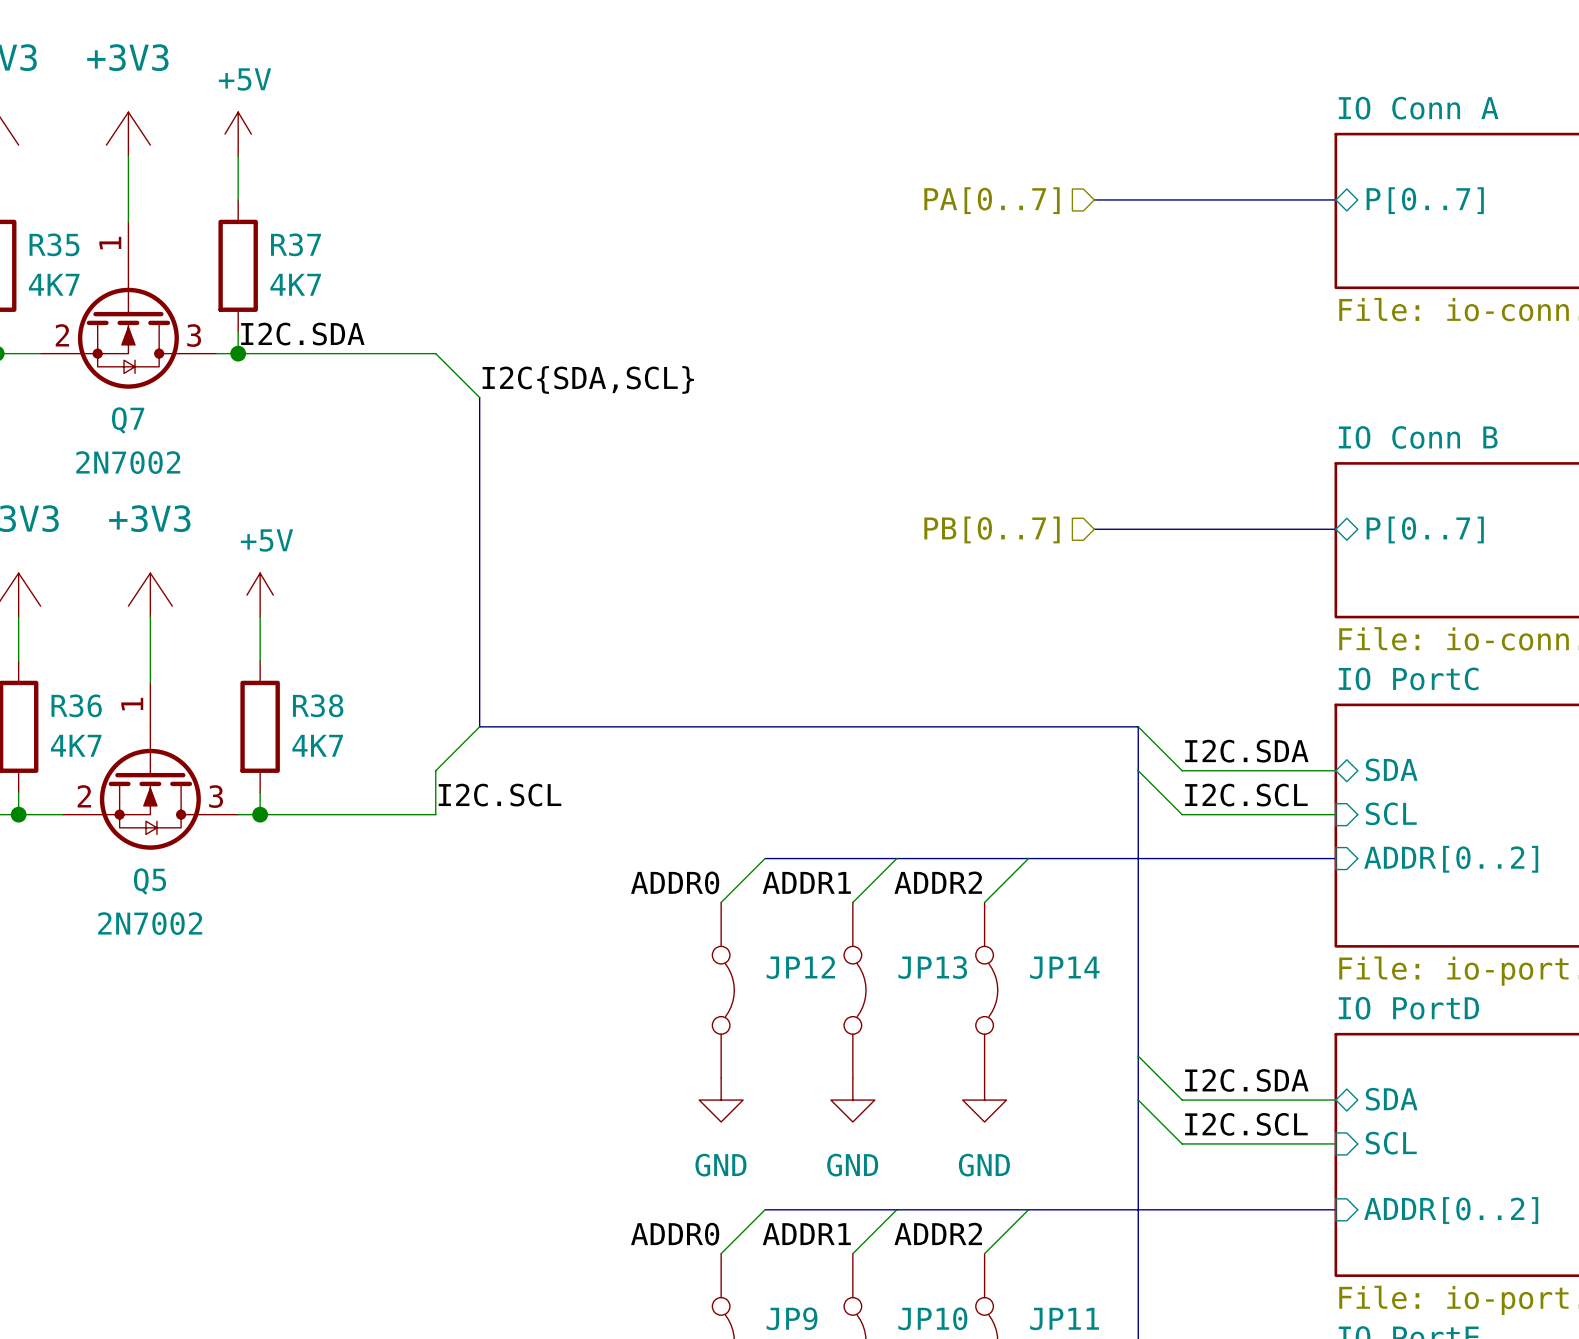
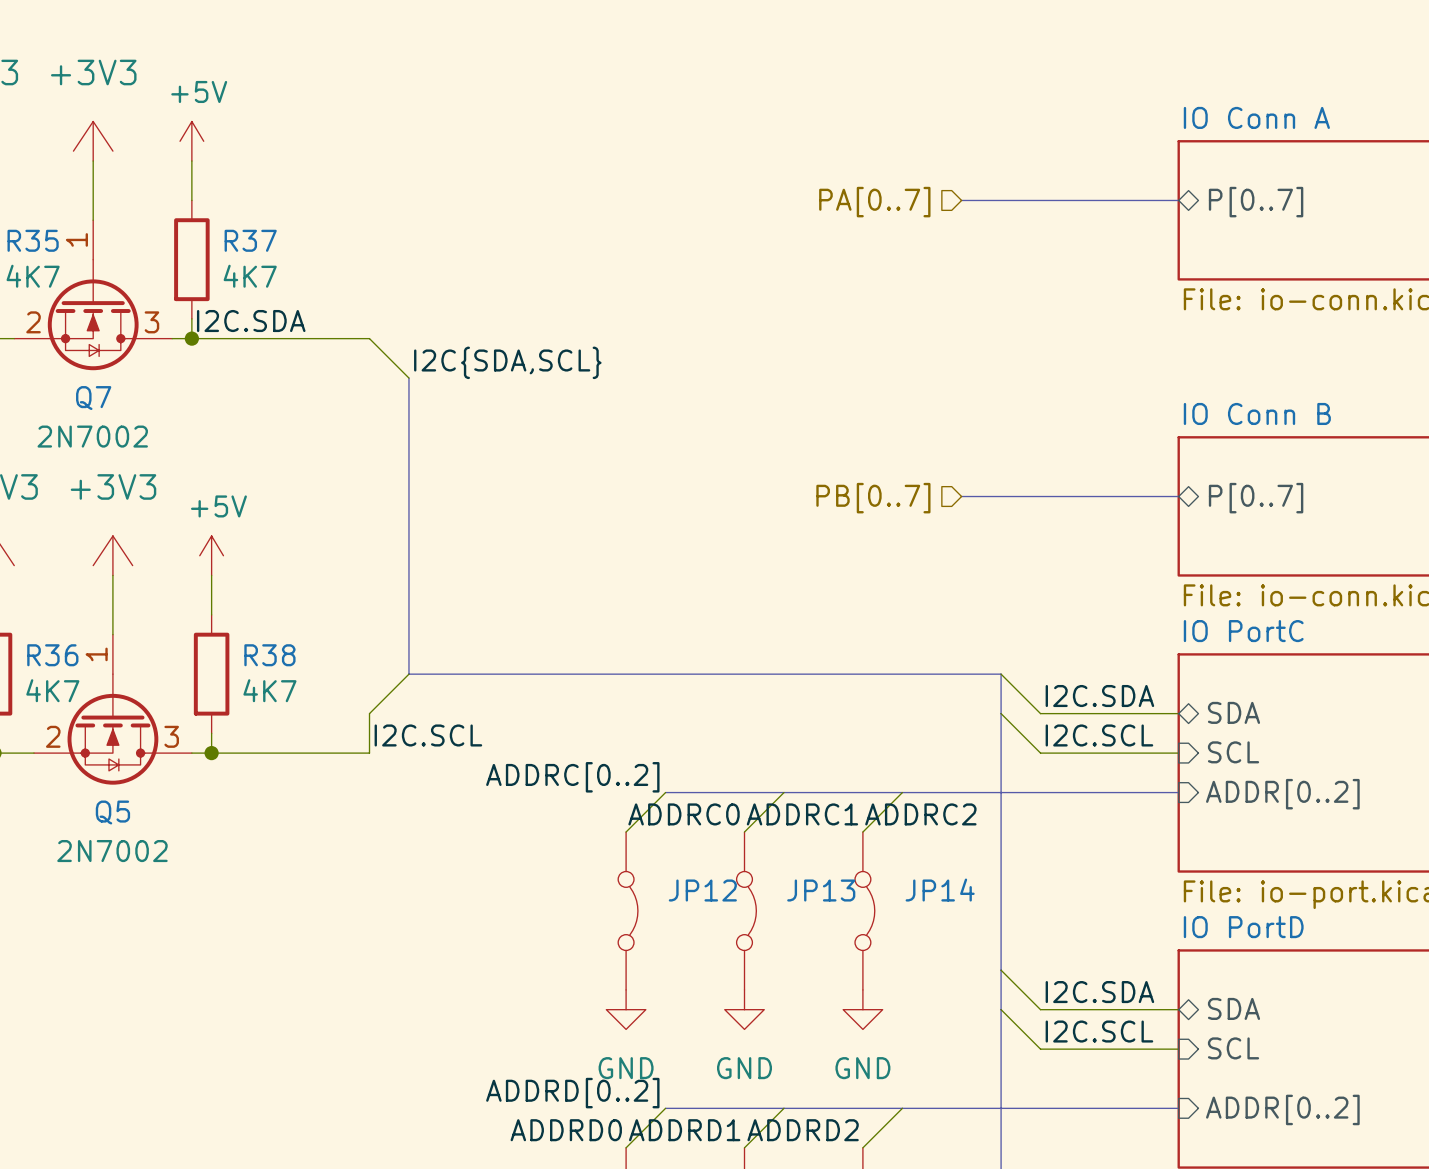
label: none -> ADDRC[0..2] (572, 777)
label: ADDR0 (675, 882) -> ADDRC0 (684, 814)
label: ADDR1 (806, 882) -> ADDRC1 (802, 814)
label: ADDR2 (938, 882) -> ADDRC2 (920, 814)
label: none -> ADDRD[0..2] (572, 1093)
label: ADDR2 (938, 1233) -> ADDRD2 (803, 1130)
label: ADDR0 (675, 1234) -> ADDRD0 (566, 1130)
label: ADDR1 (806, 1234) -> ADDRD1 (684, 1130)

